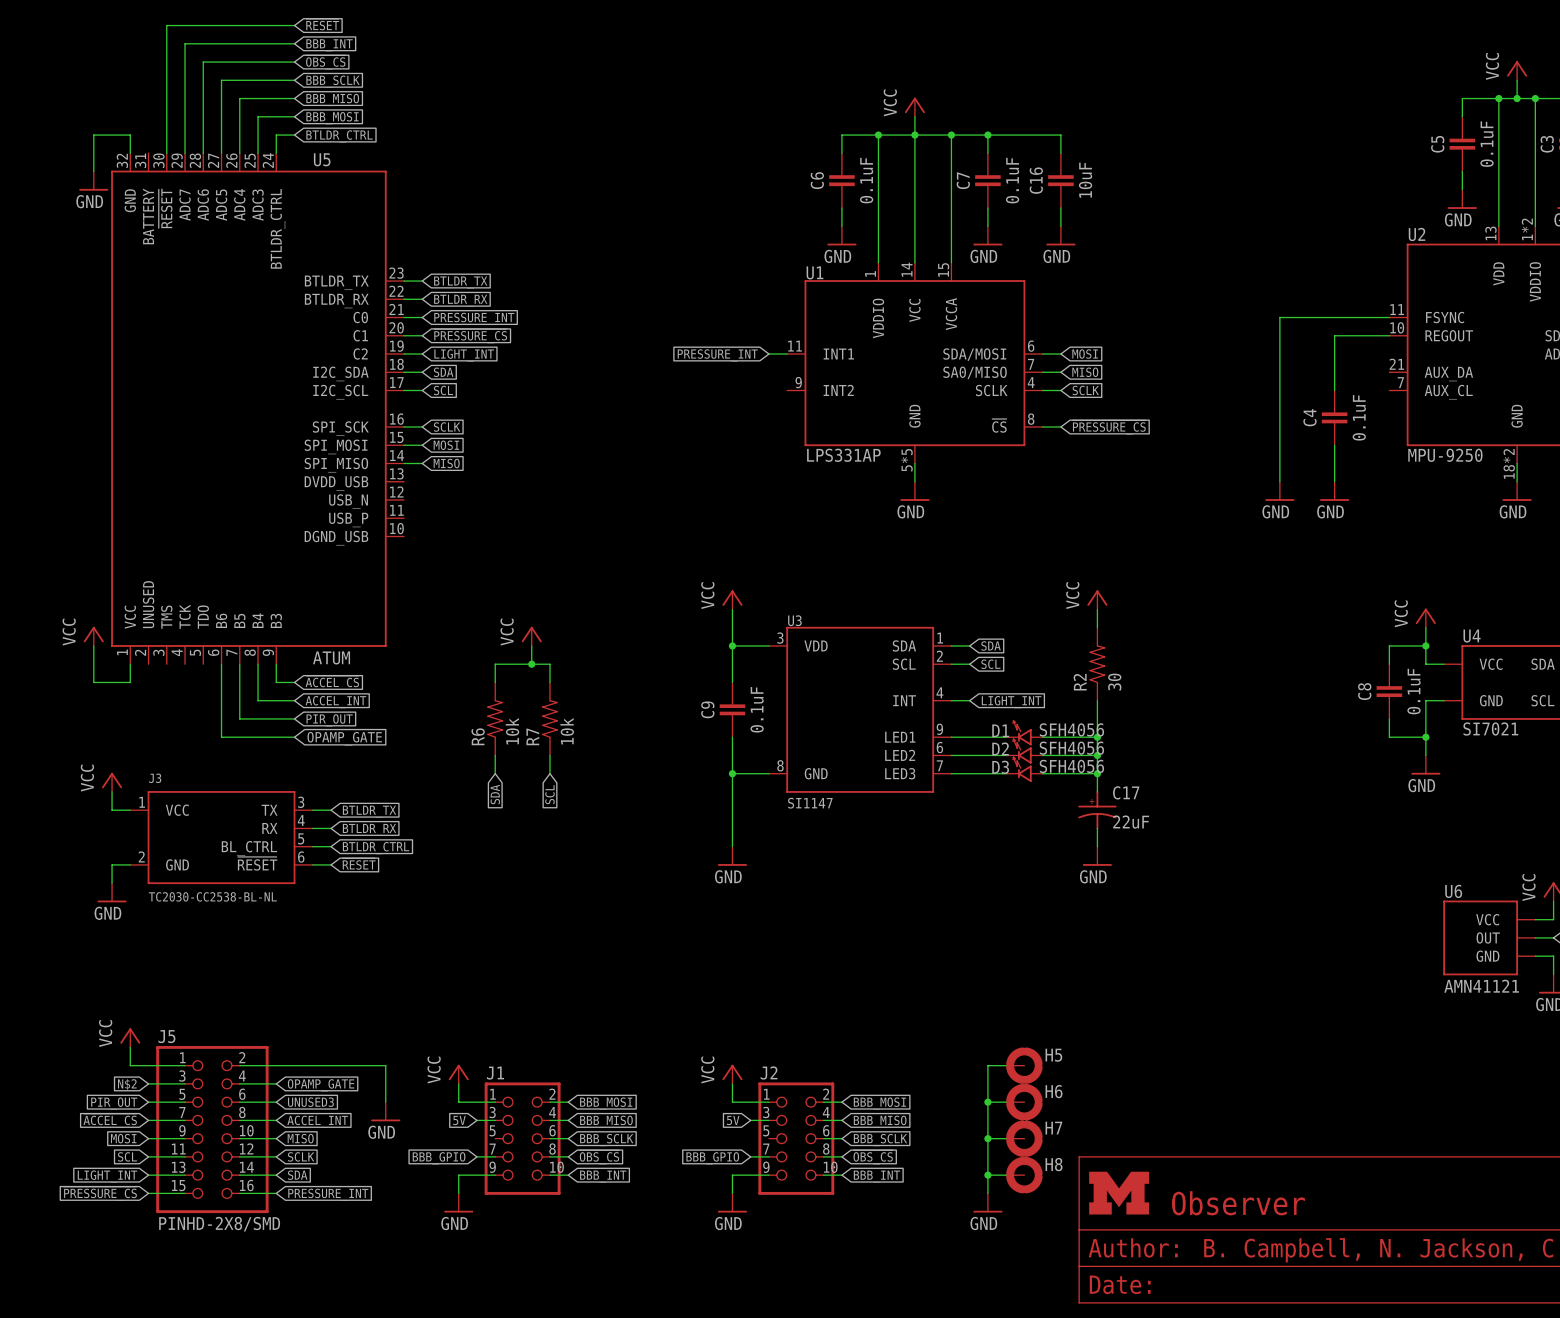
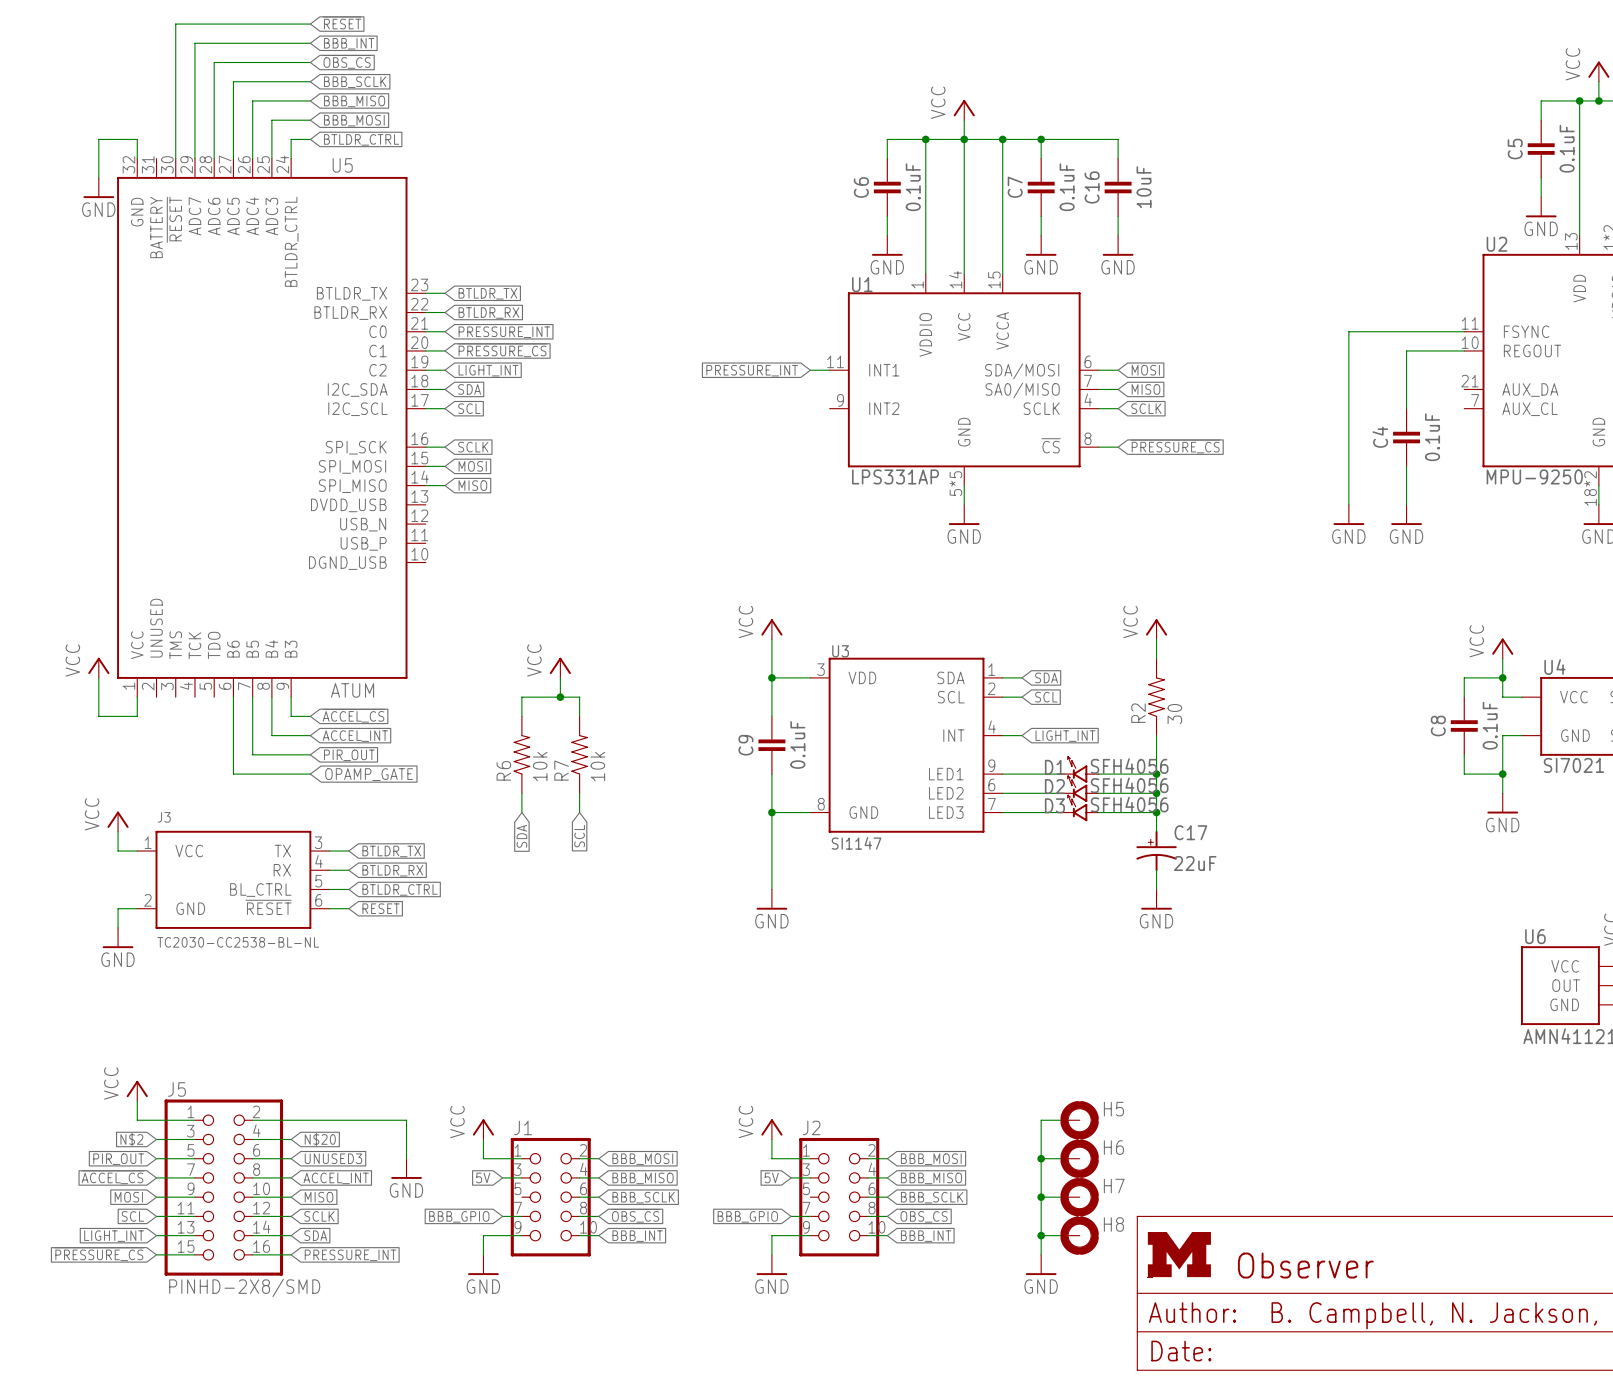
global label: OPAMP_GATE (321, 1085) -> N$20 (320, 1139)

